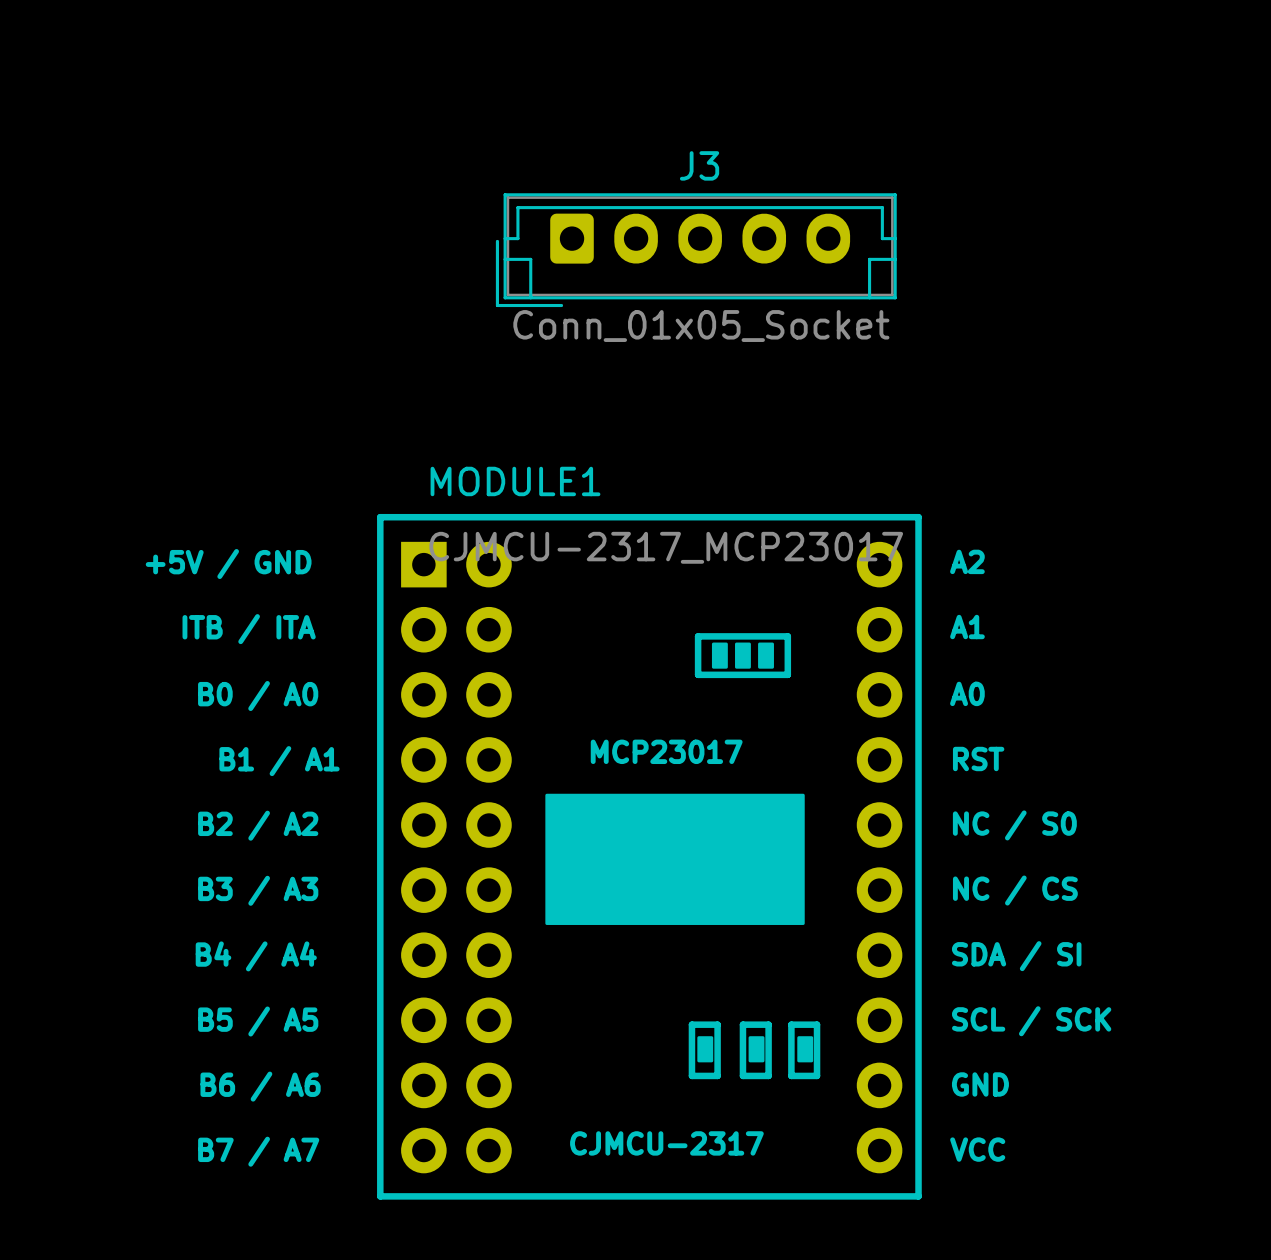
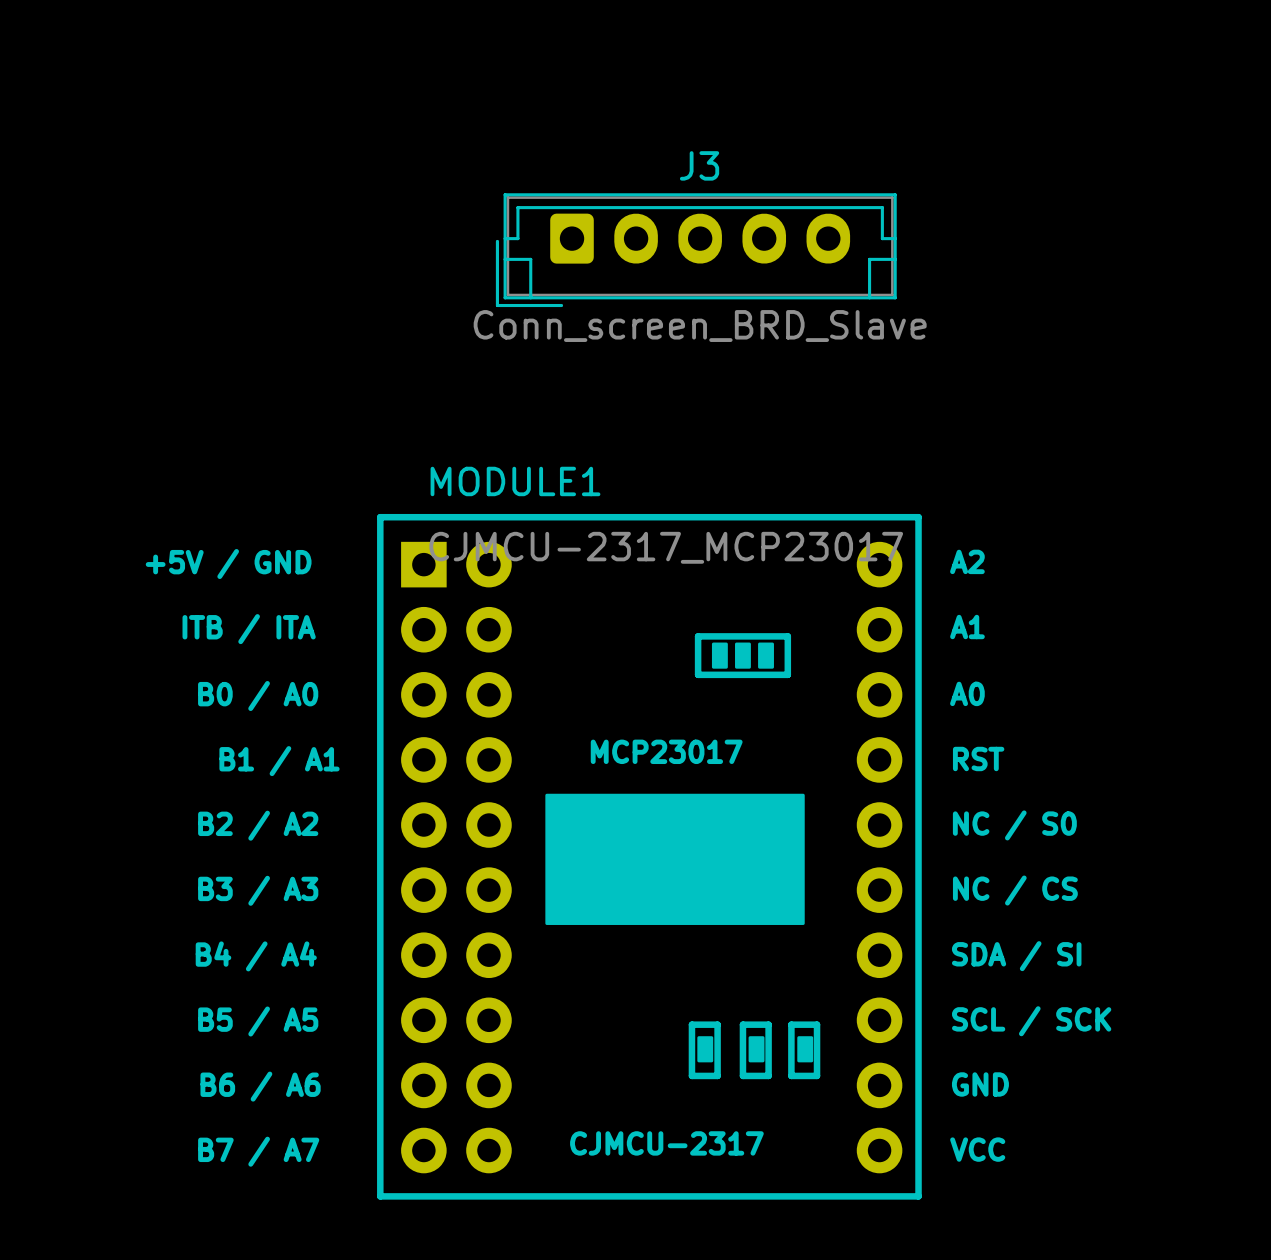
J3 value: Conn_01x05_Socket (701, 326) -> Conn_screen_BRD_Slave (700, 326)

